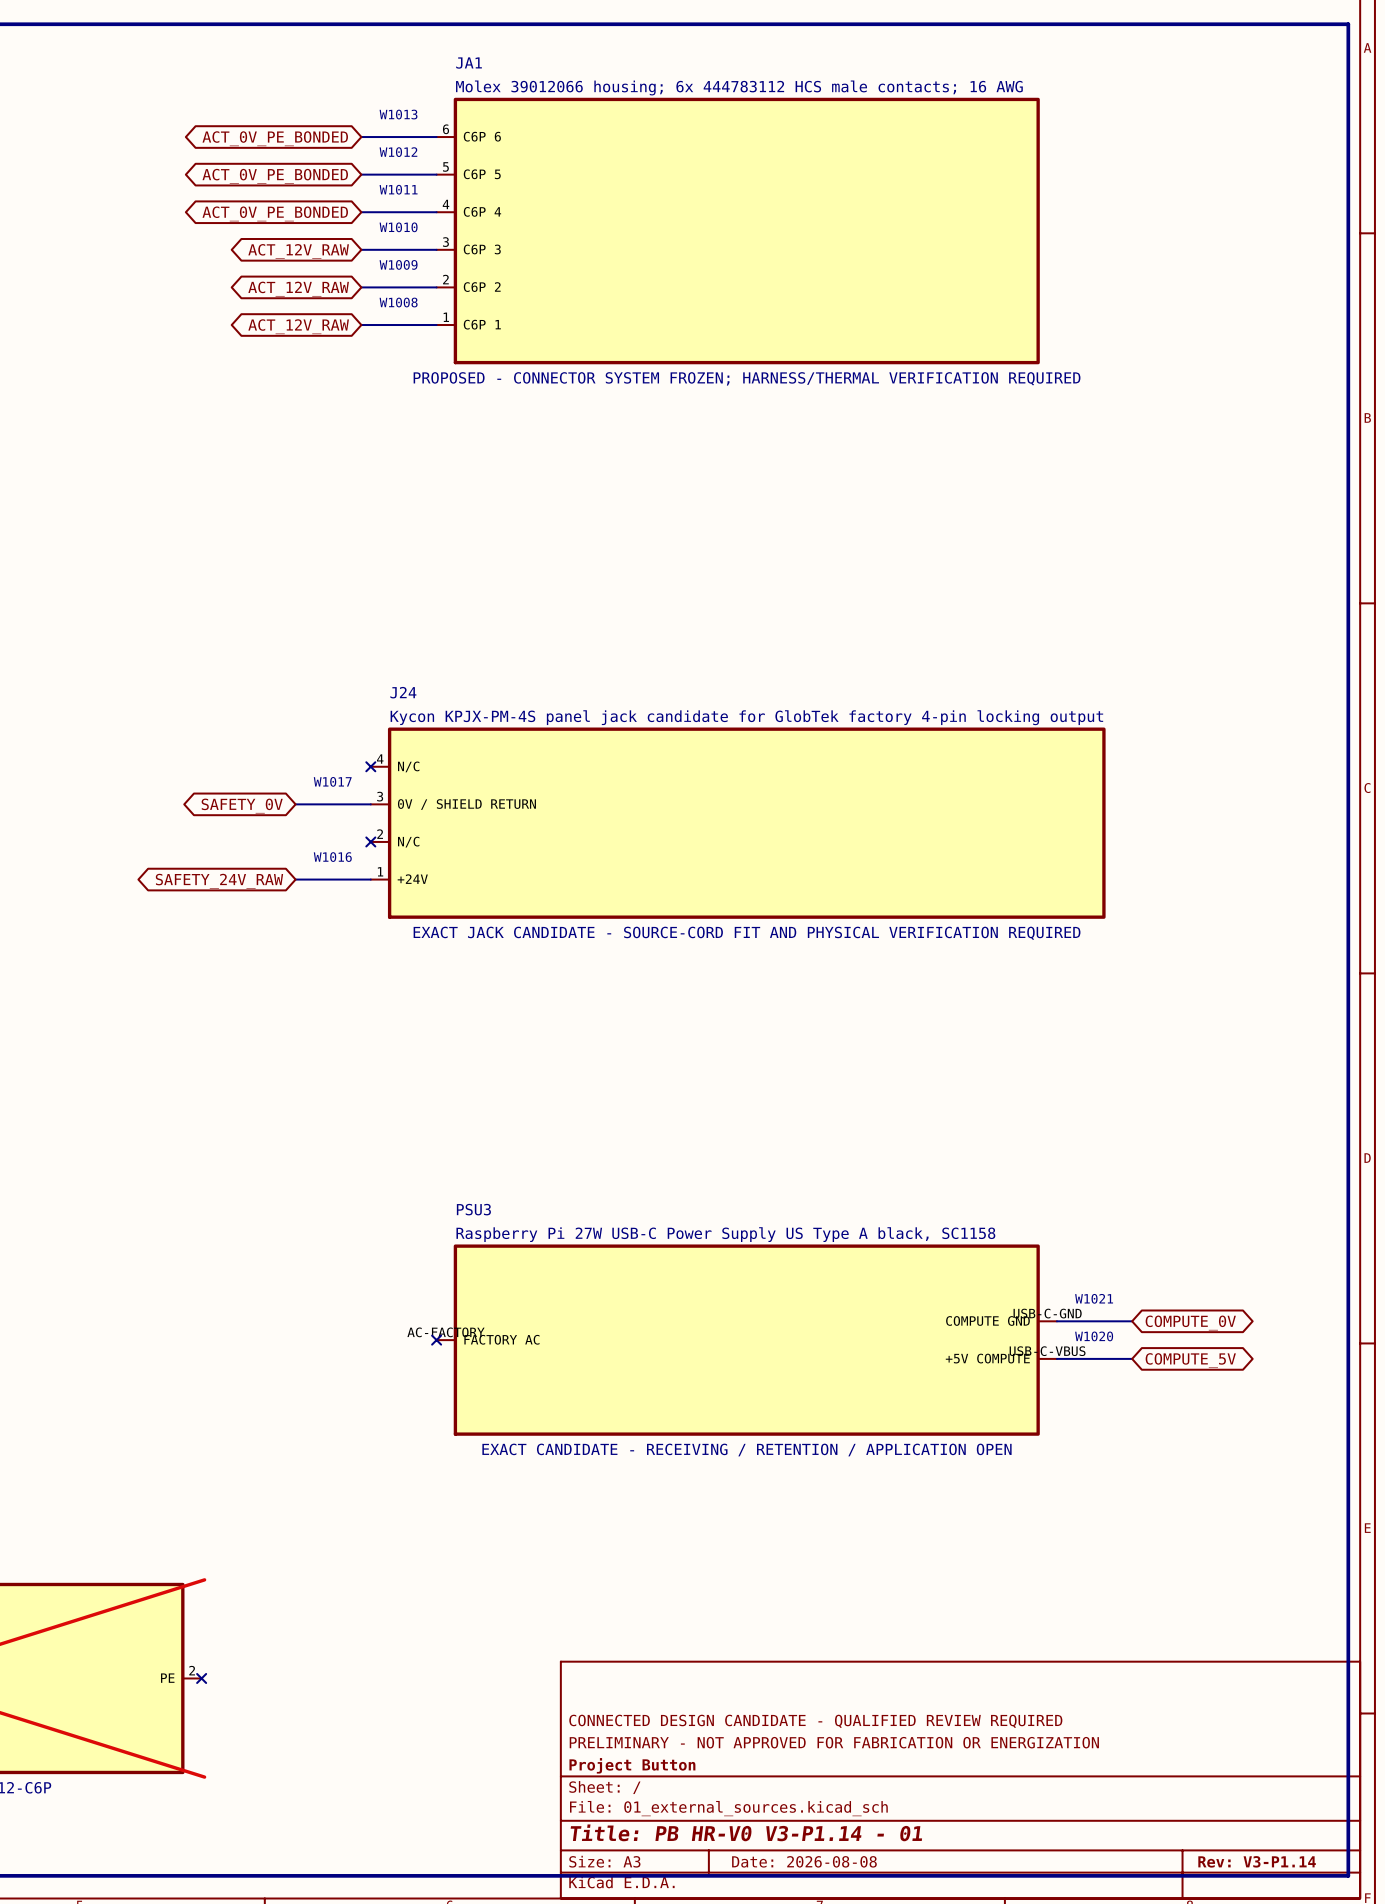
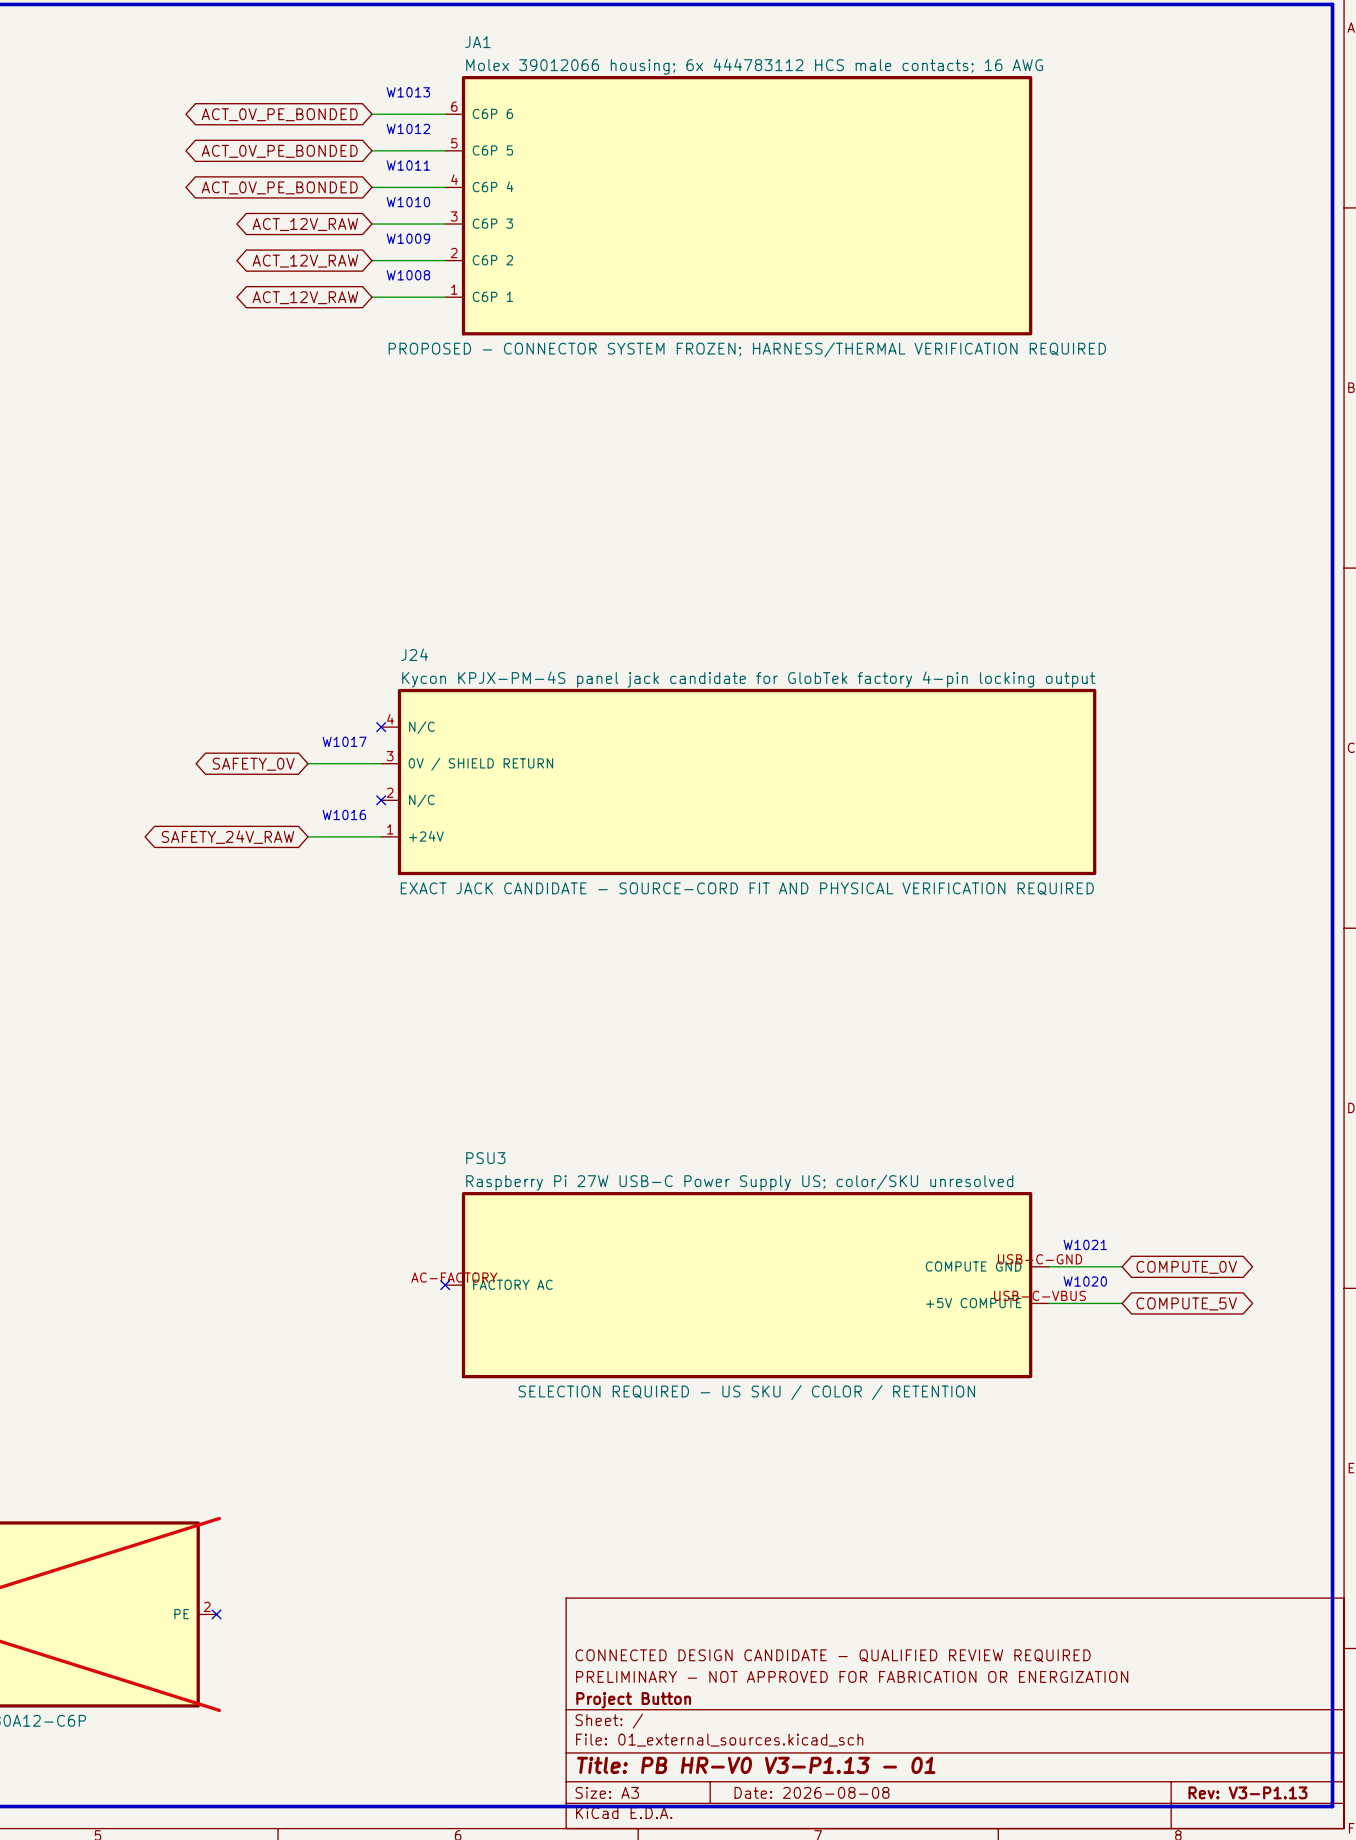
PSU3 text: Raspberry Pi 27W USB-C Power Supply US Type A black, SC1158 (725, 1234) -> Raspberry Pi 27W USB-C Power Supply US; color/SKU unresolved (739, 1182)
PSU3 text: EXACT CANDIDATE - RECEIVING / RETENTION / APPLICATION OPEN (746, 1450) -> SELECTION REQUIRED - US SKU / COLOR / RETENTION (746, 1392)
title block: Title: PB HR-V0 V3-P1.14 - 01 (746, 1832) -> Title: PB HR-V0 V3-P1.13 - 01 (756, 1765)
title block: Rev: V3-P1.14 (1257, 1861) -> Rev: V3-P1.13 (1247, 1792)

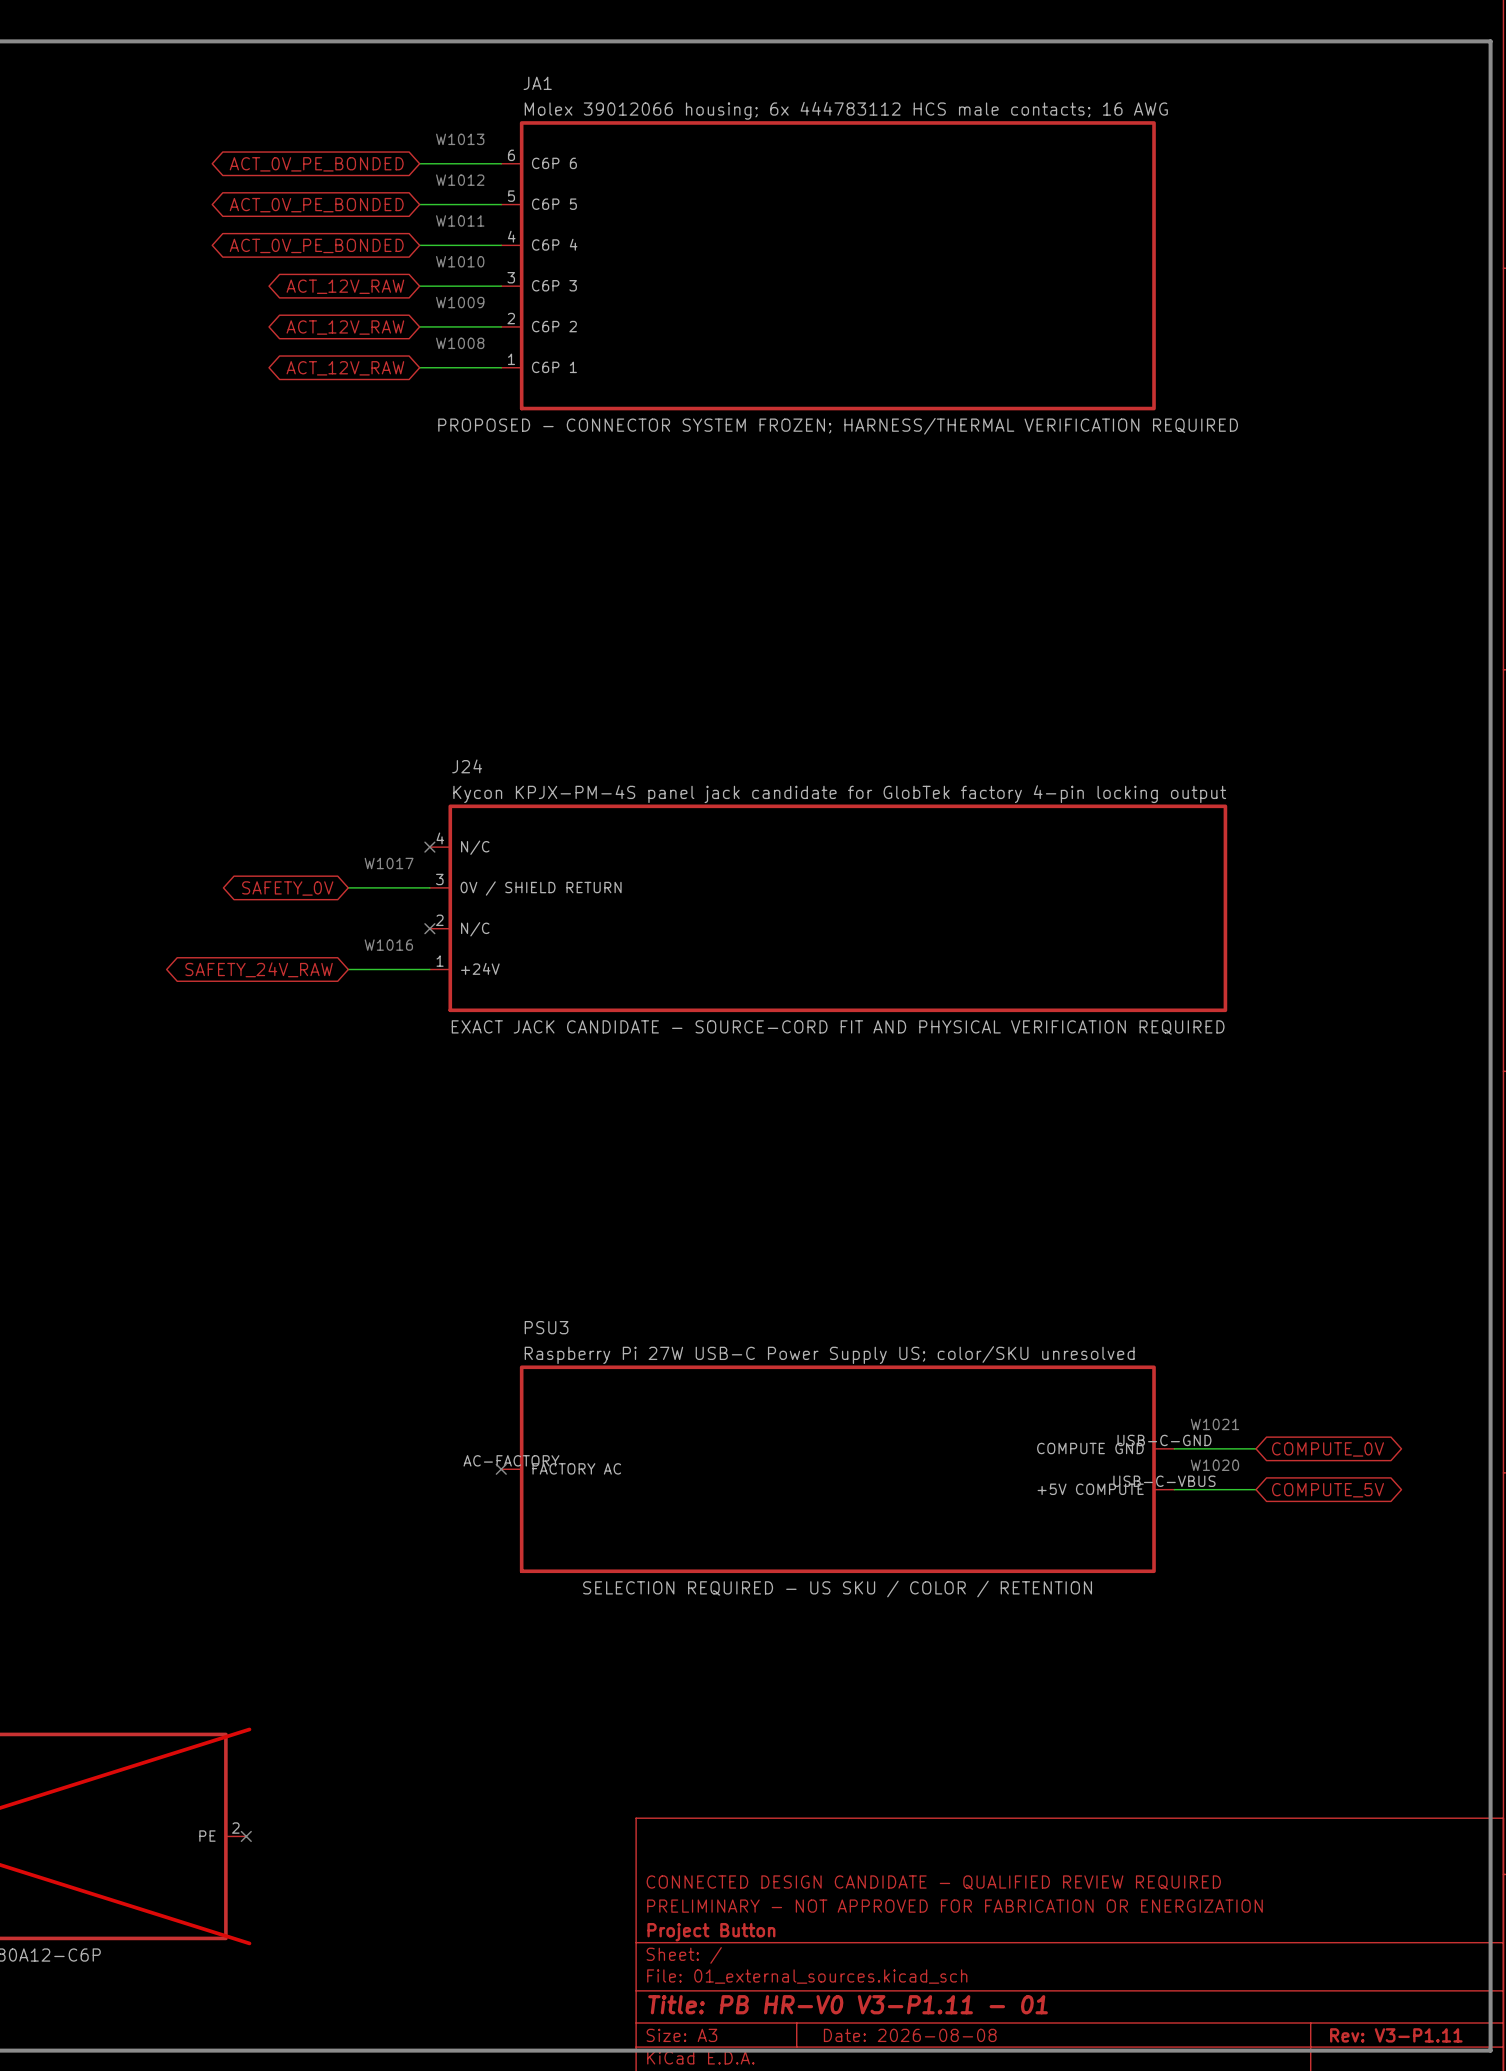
title block: Title: PB HR-V0 V3-P1.13 - 01 (756, 1765) -> Title: PB HR-V0 V3-P1.11 - 01 (848, 2004)
title block: Rev: V3-P1.13 (1247, 1792) -> Rev: V3-P1.11 (1396, 2035)

